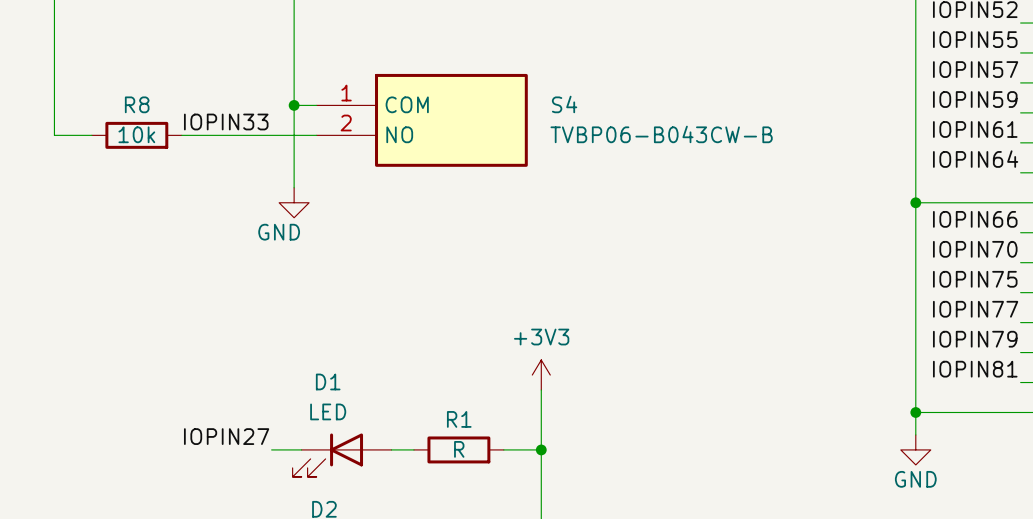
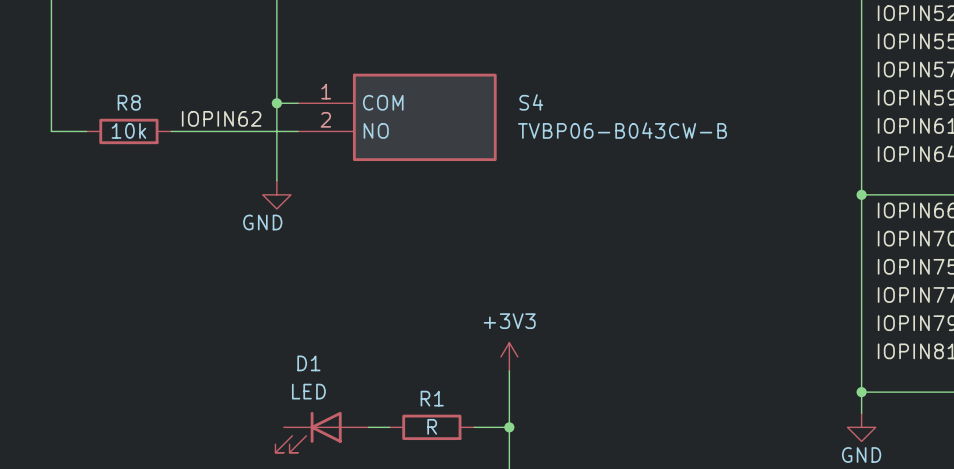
label: IOPIN33 (226, 121) -> IOPIN62 (221, 118)
label: IOPIN27 (226, 436) -> none
wire: (271, 449) (301, 449) -> none

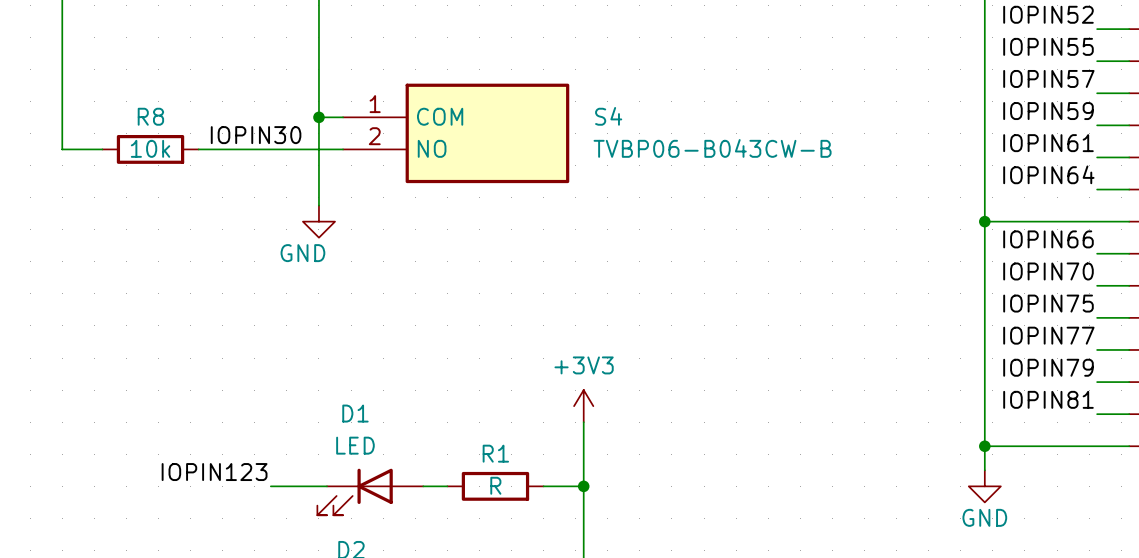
label: IOPIN62 (221, 118) -> IOPIN30 (256, 135)
label: none -> IOPIN123 (214, 472)
wire: none -> (270, 486) (327, 486)

